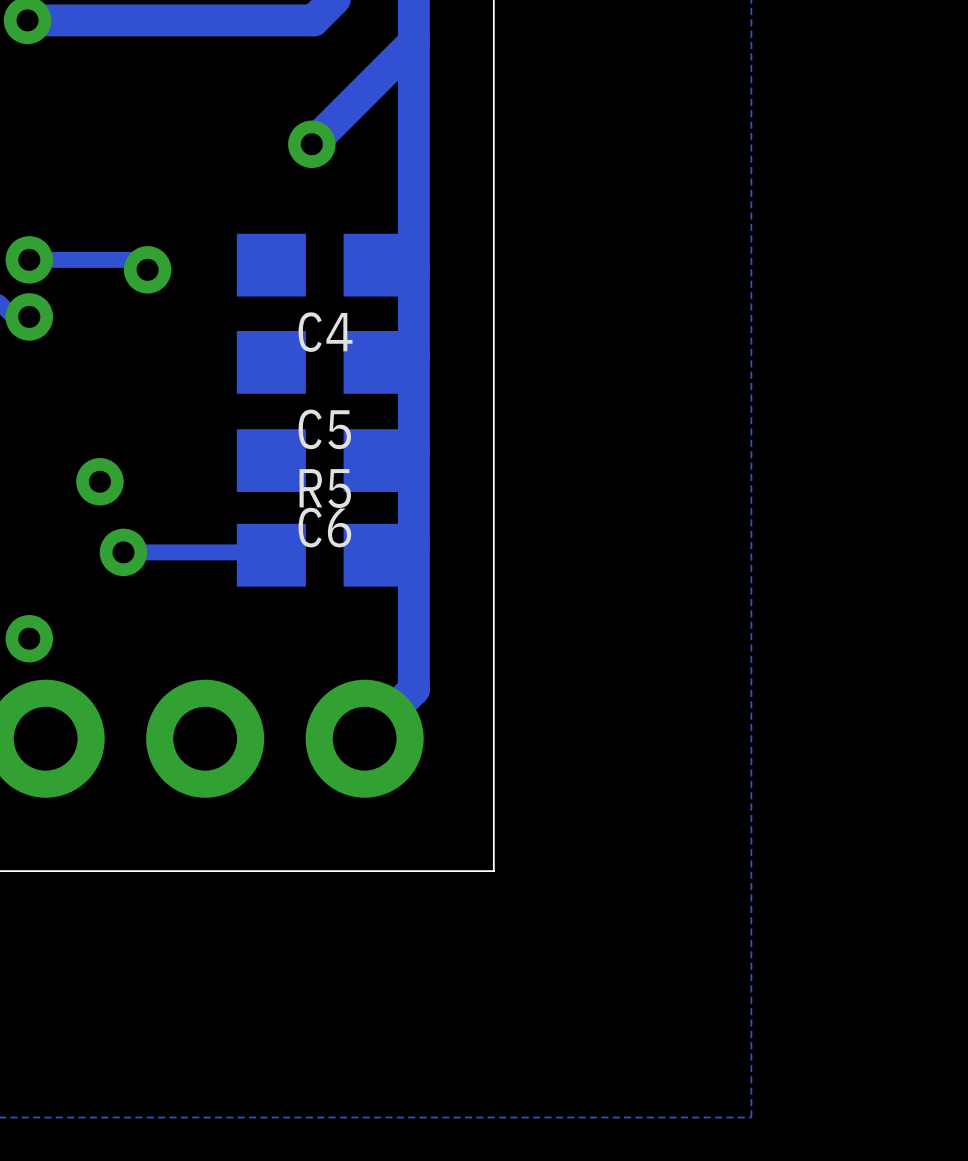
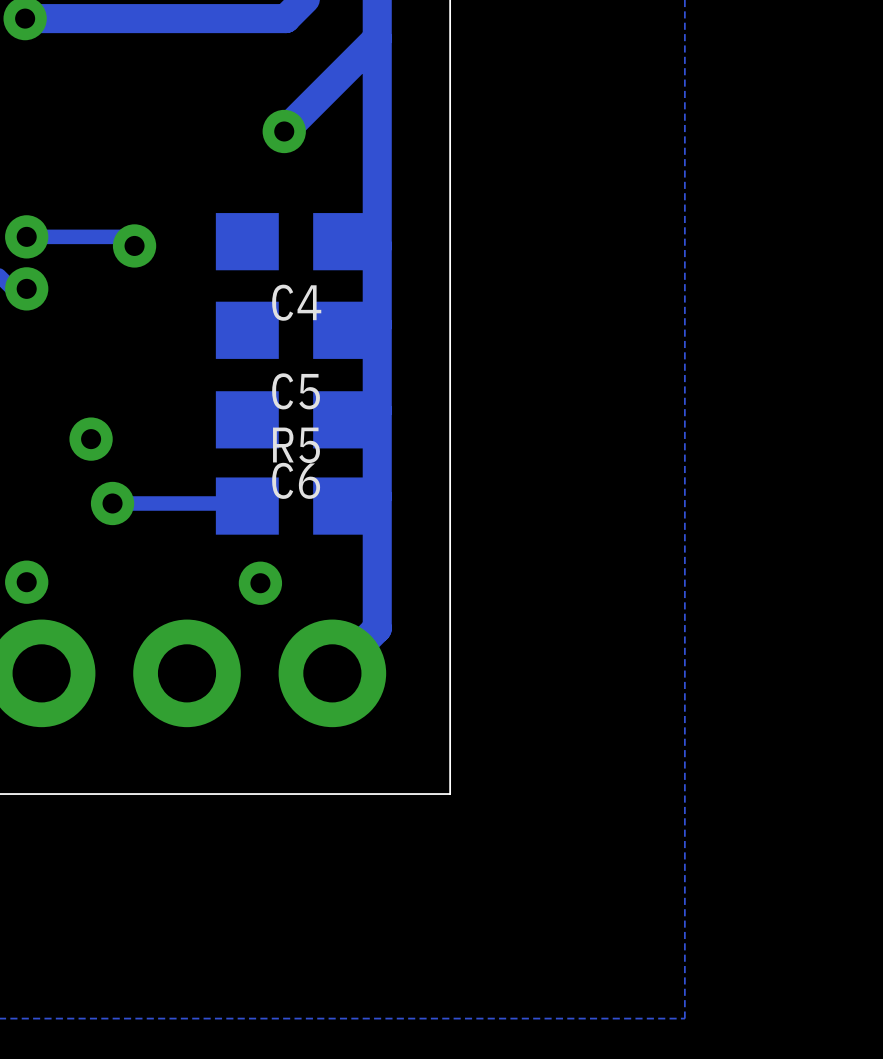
via: none -> (260, 583)

